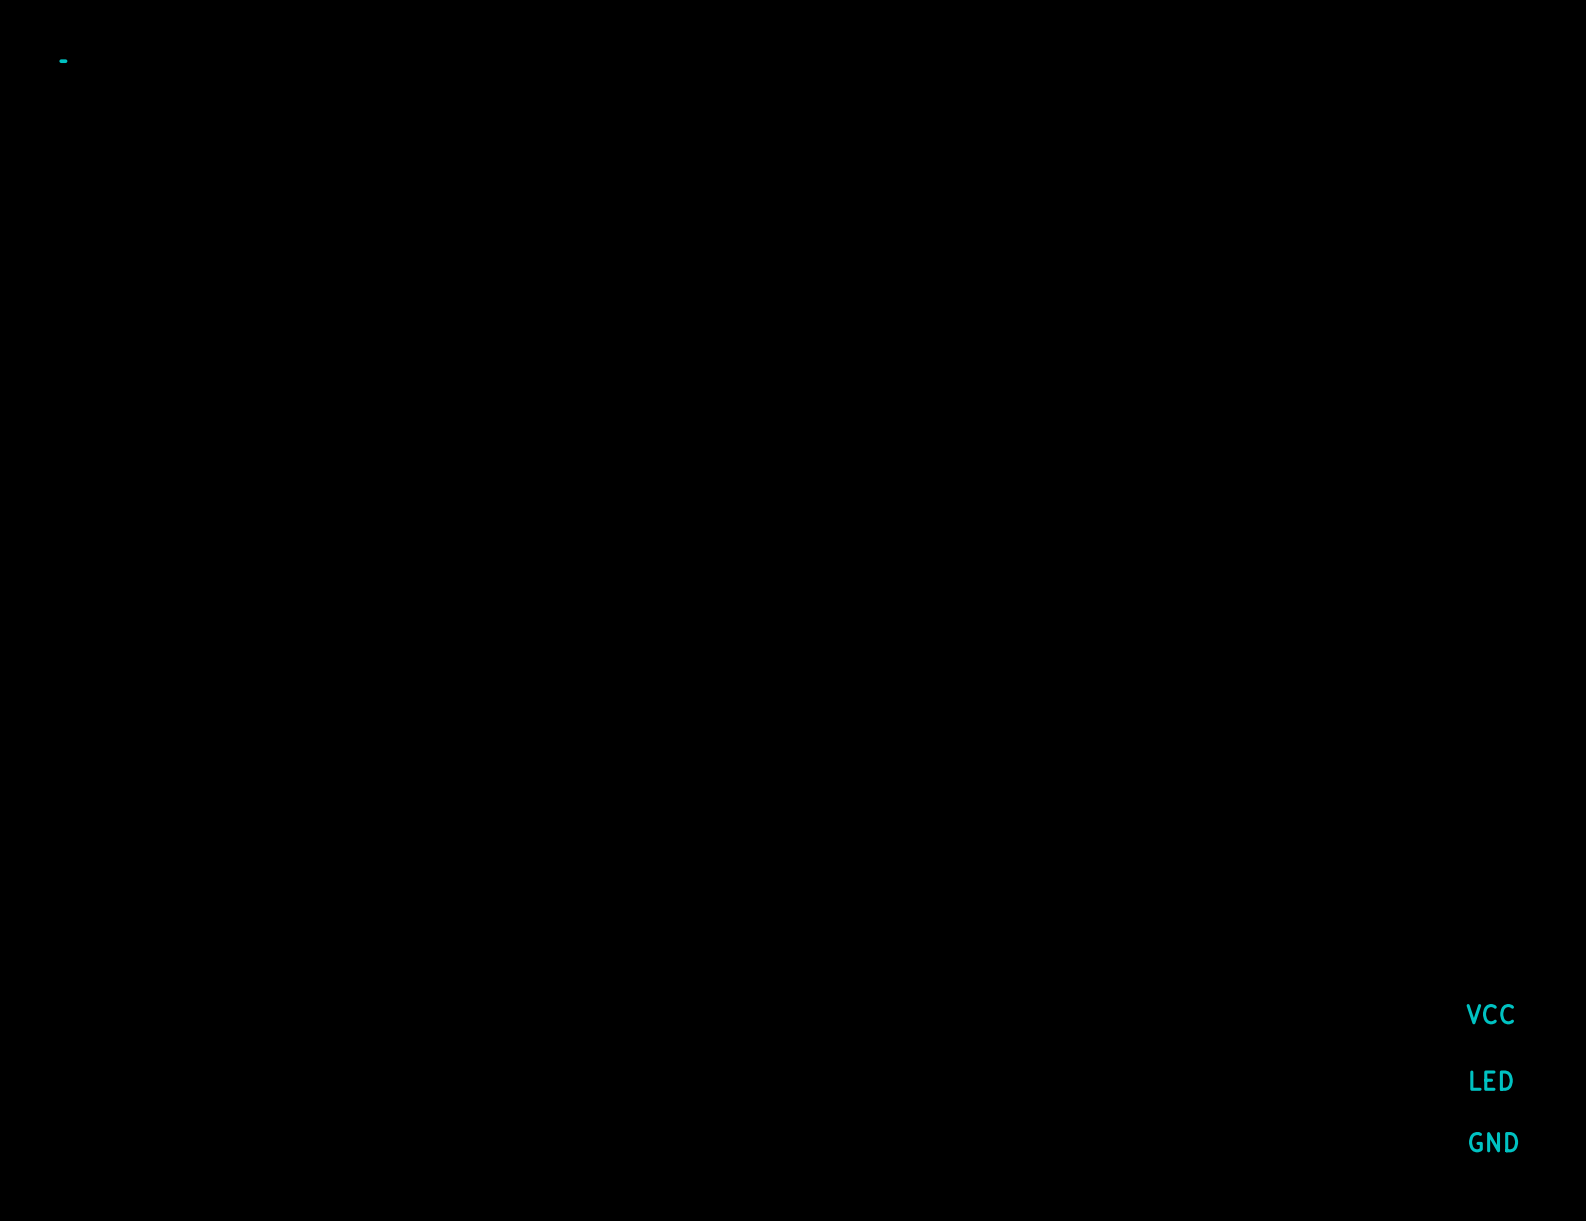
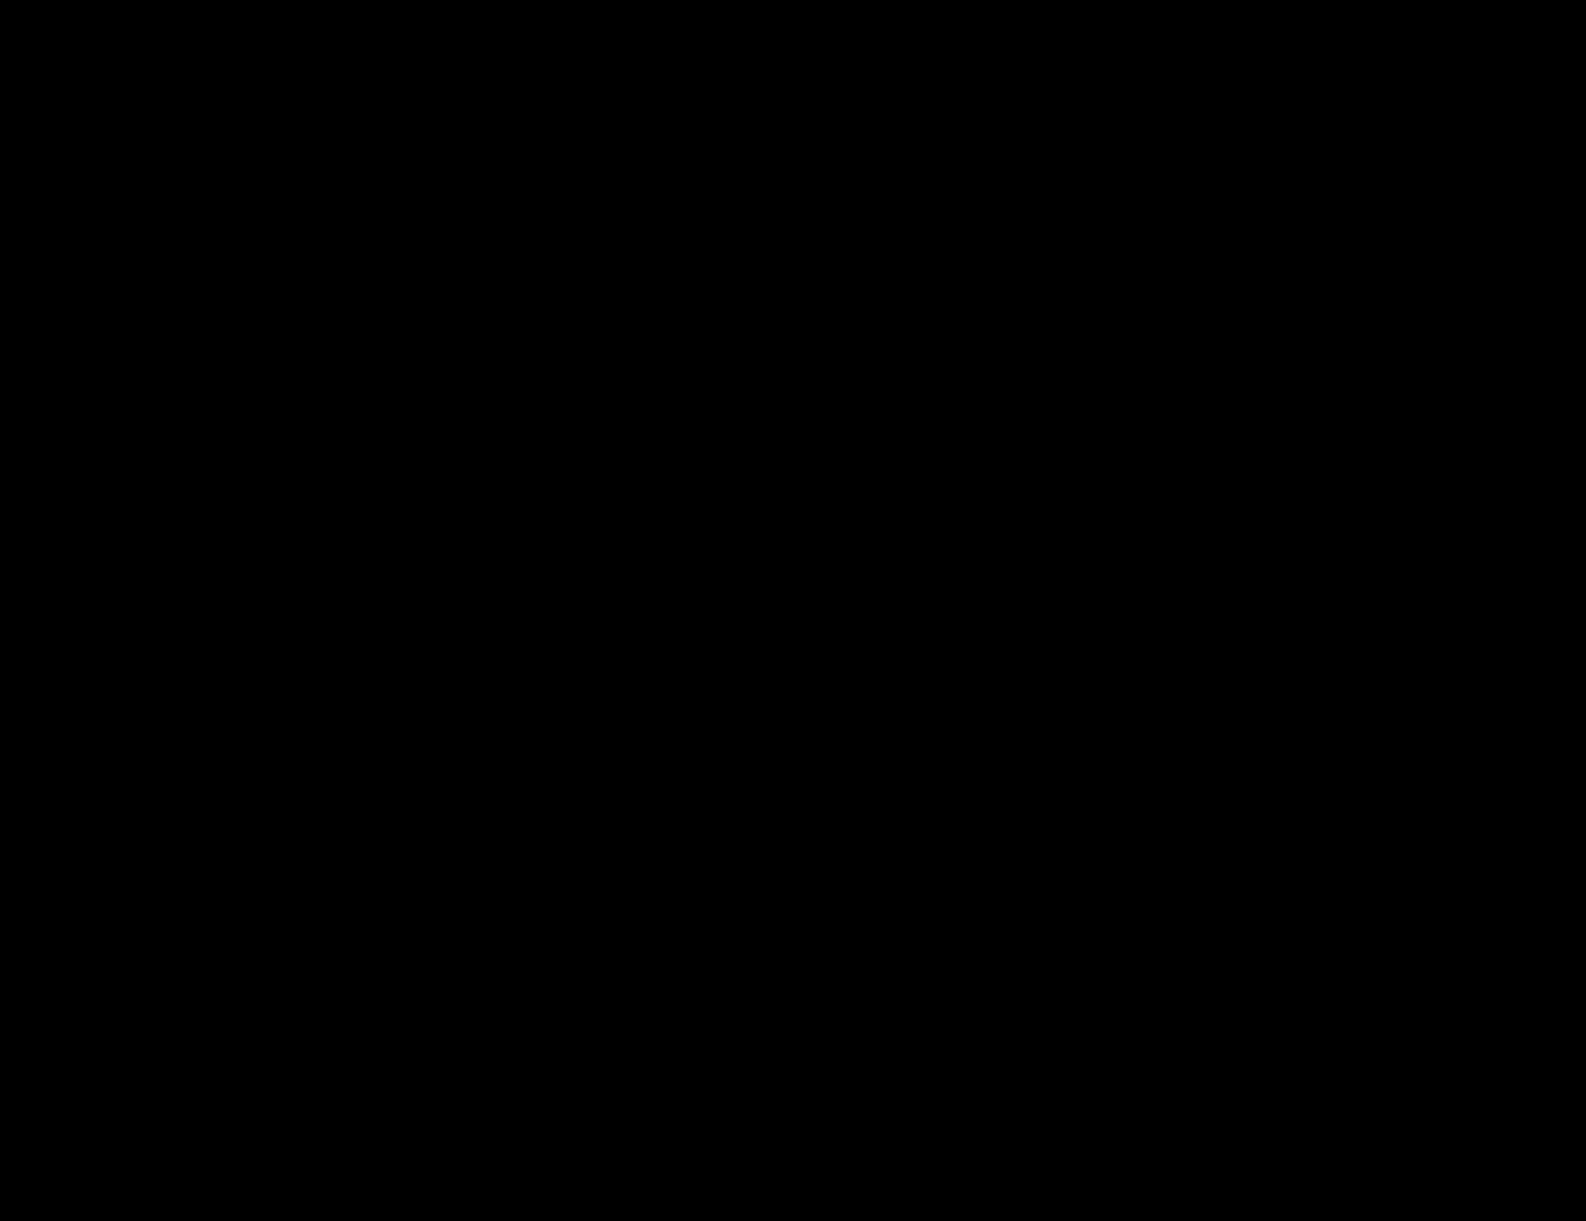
line: (61, 61) (65, 61) -> none
text: VCC (1490, 1014) -> none
text: LED (1491, 1080) -> none
text: GND (1493, 1142) -> none

